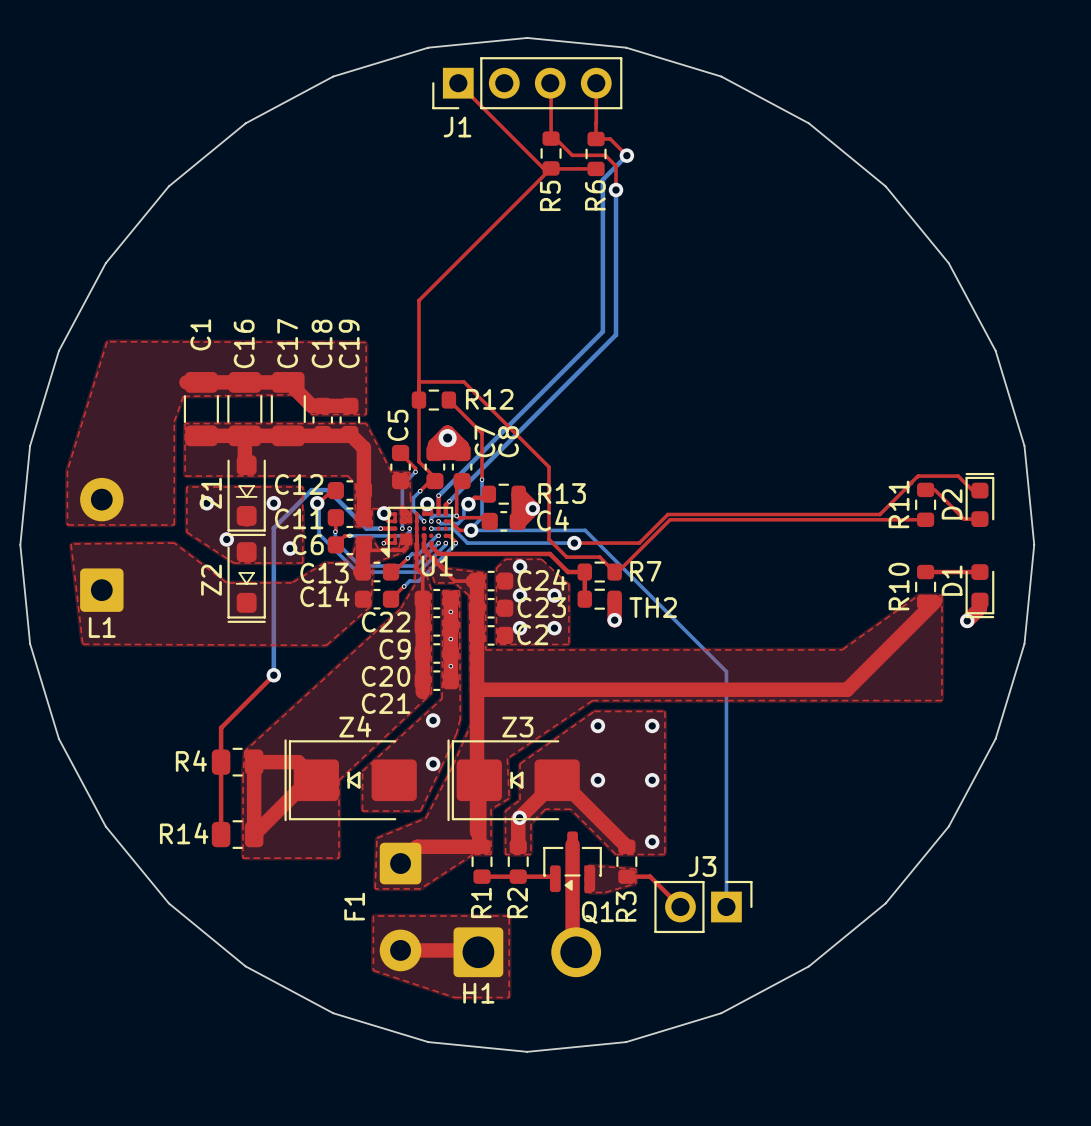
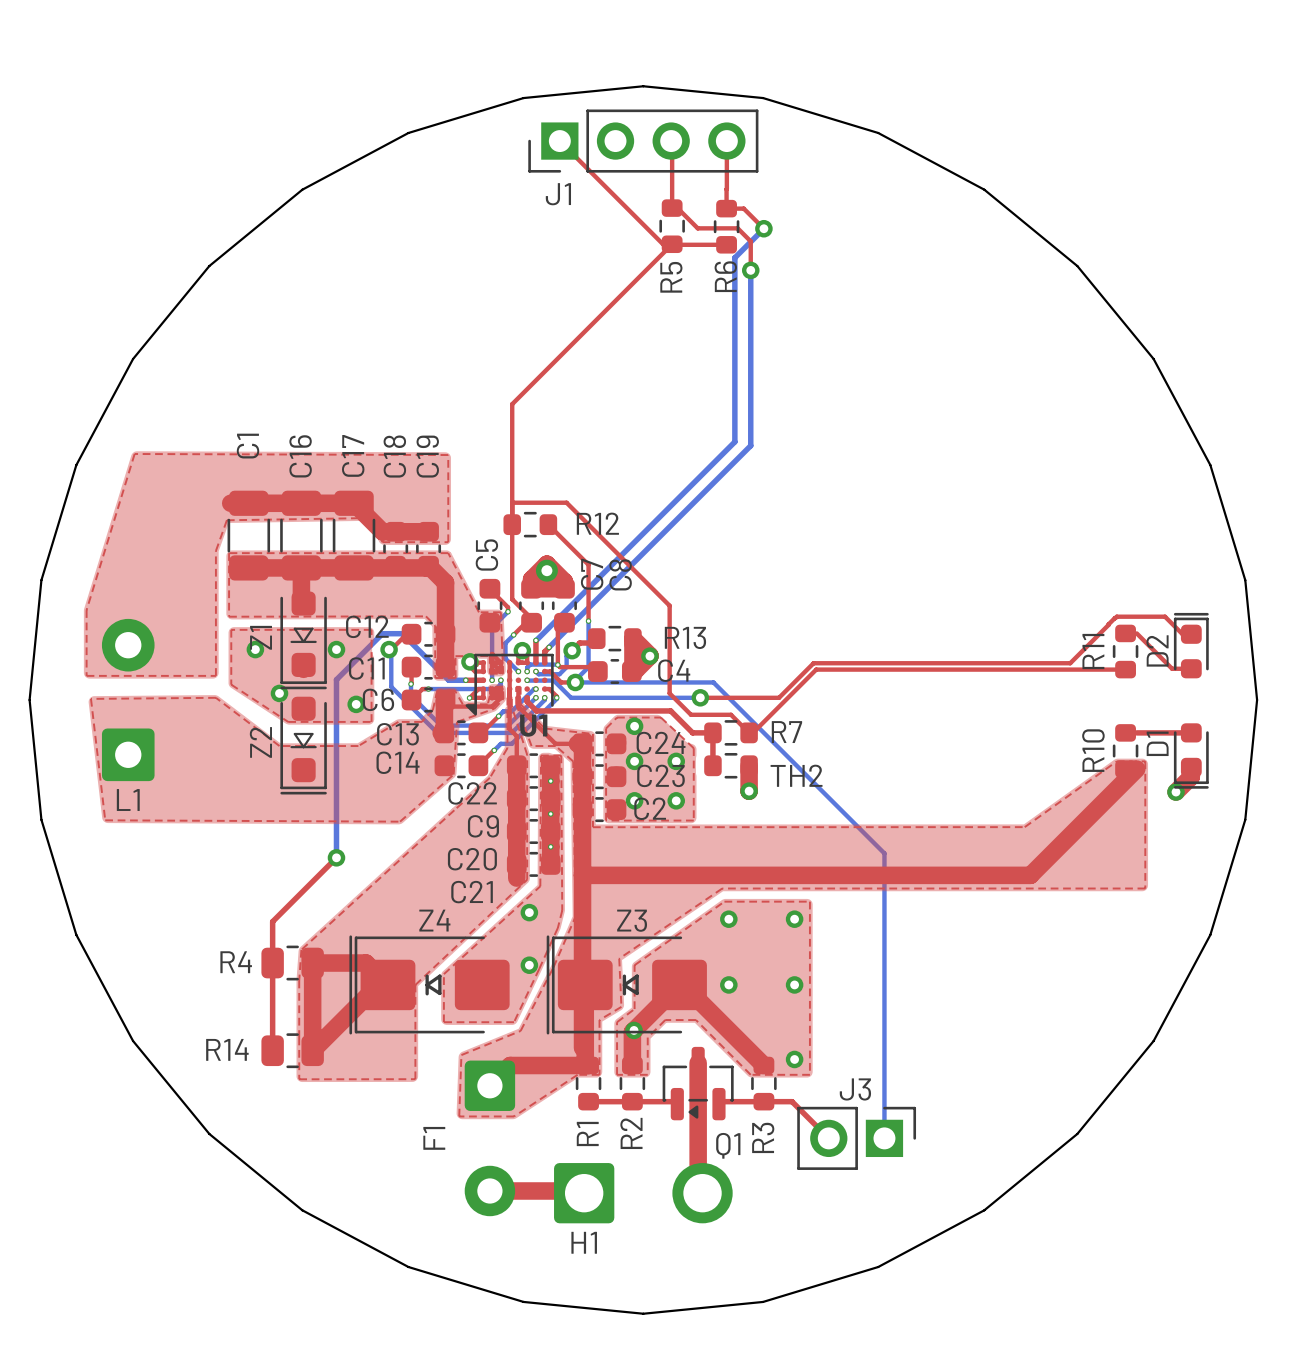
top zone outline: (585, 865) (635, 868) (635, 883) (605, 892) (585, 892) (585, 865) -> none
top track: none -> (763, 1101) (721, 1101) (718, 1104)
top zone outline: (373, 916) (509, 916) (509, 997) (454, 997) (373, 970) (373, 916) -> none

